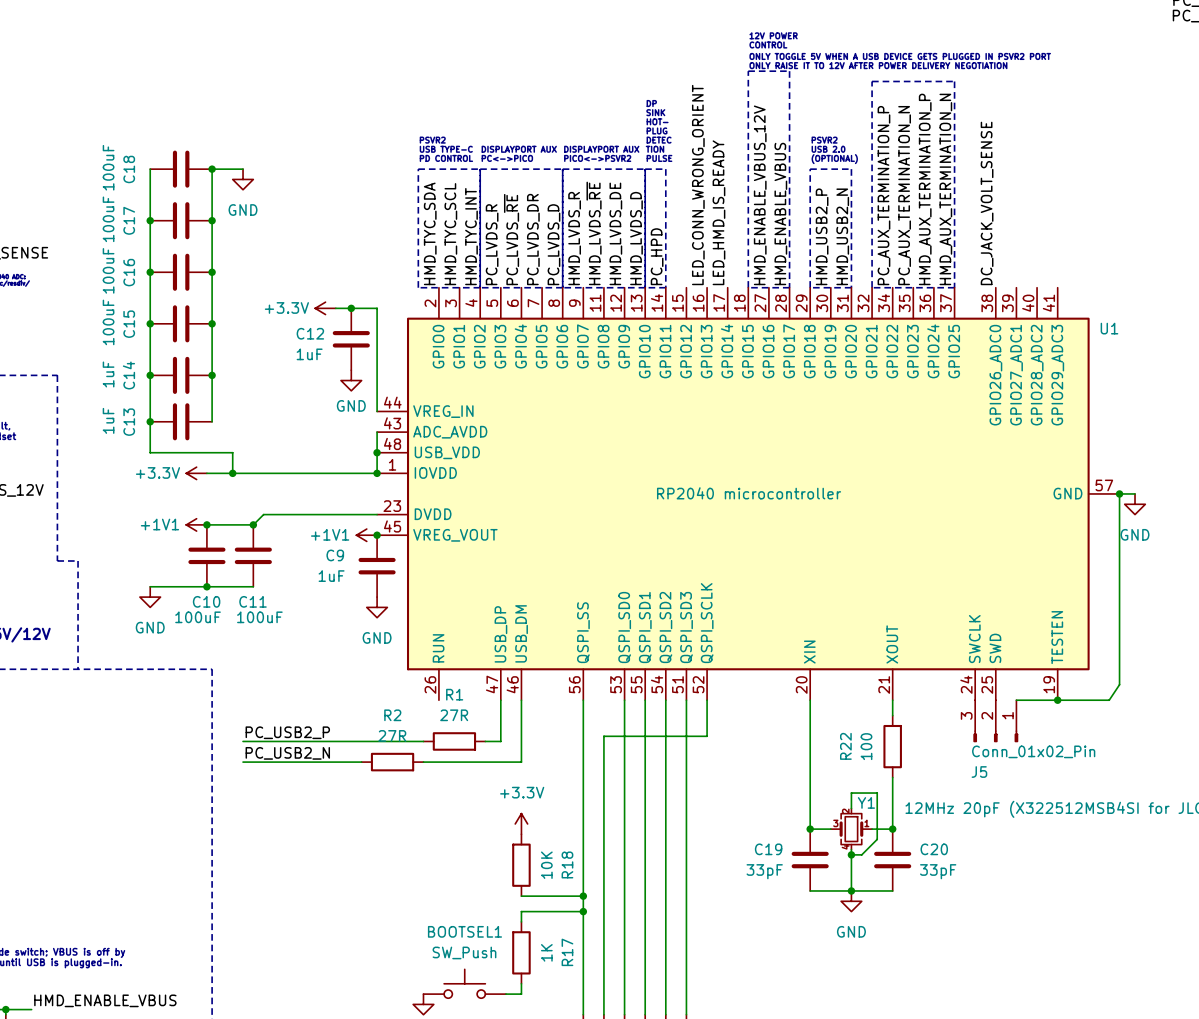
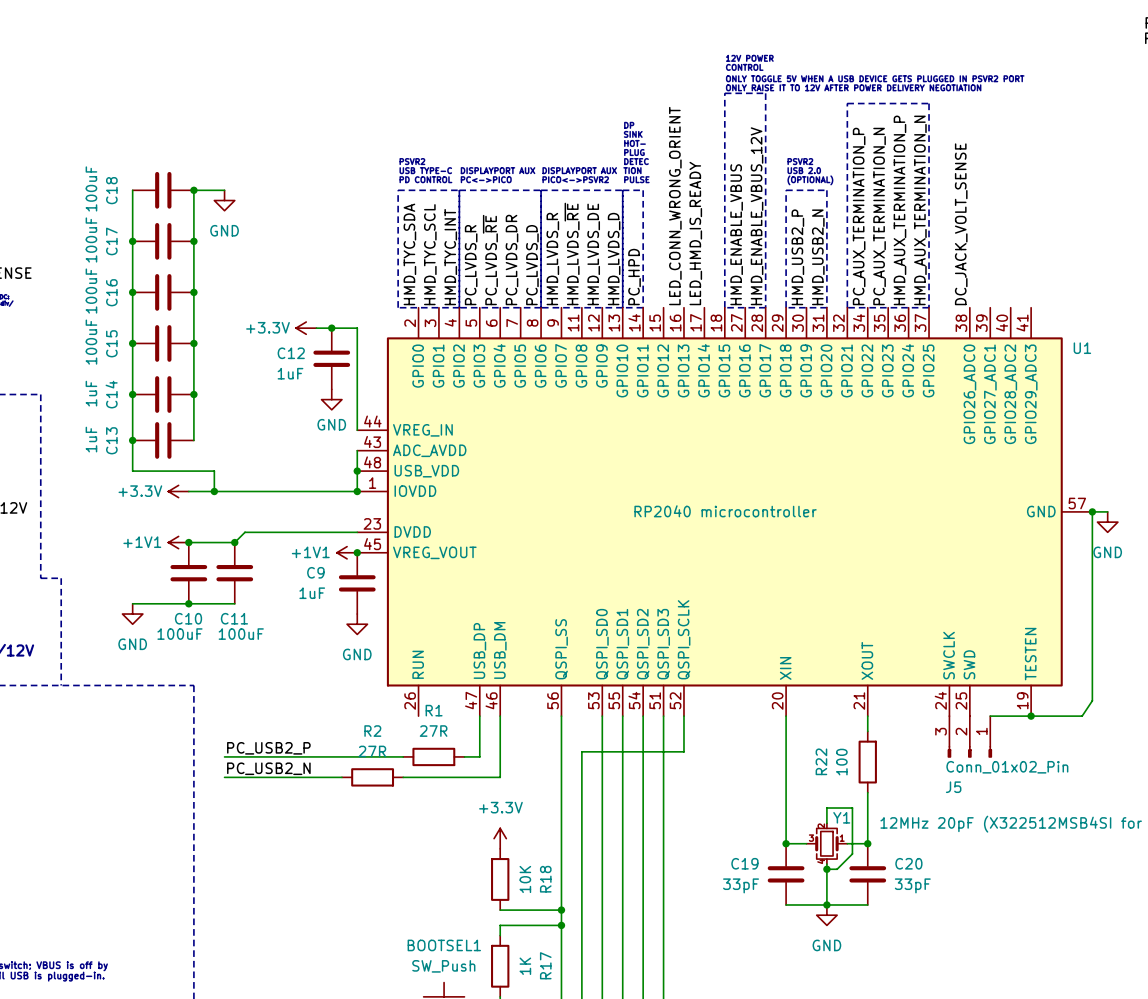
label: HMD_ENABLE_VBUS_12V (760, 195) -> HMD_ENABLE_VBUS (736, 234)
label: HMD_ENABLE_VBUS (780, 214) -> HMD_ENABLE_VBUS_12V (757, 216)

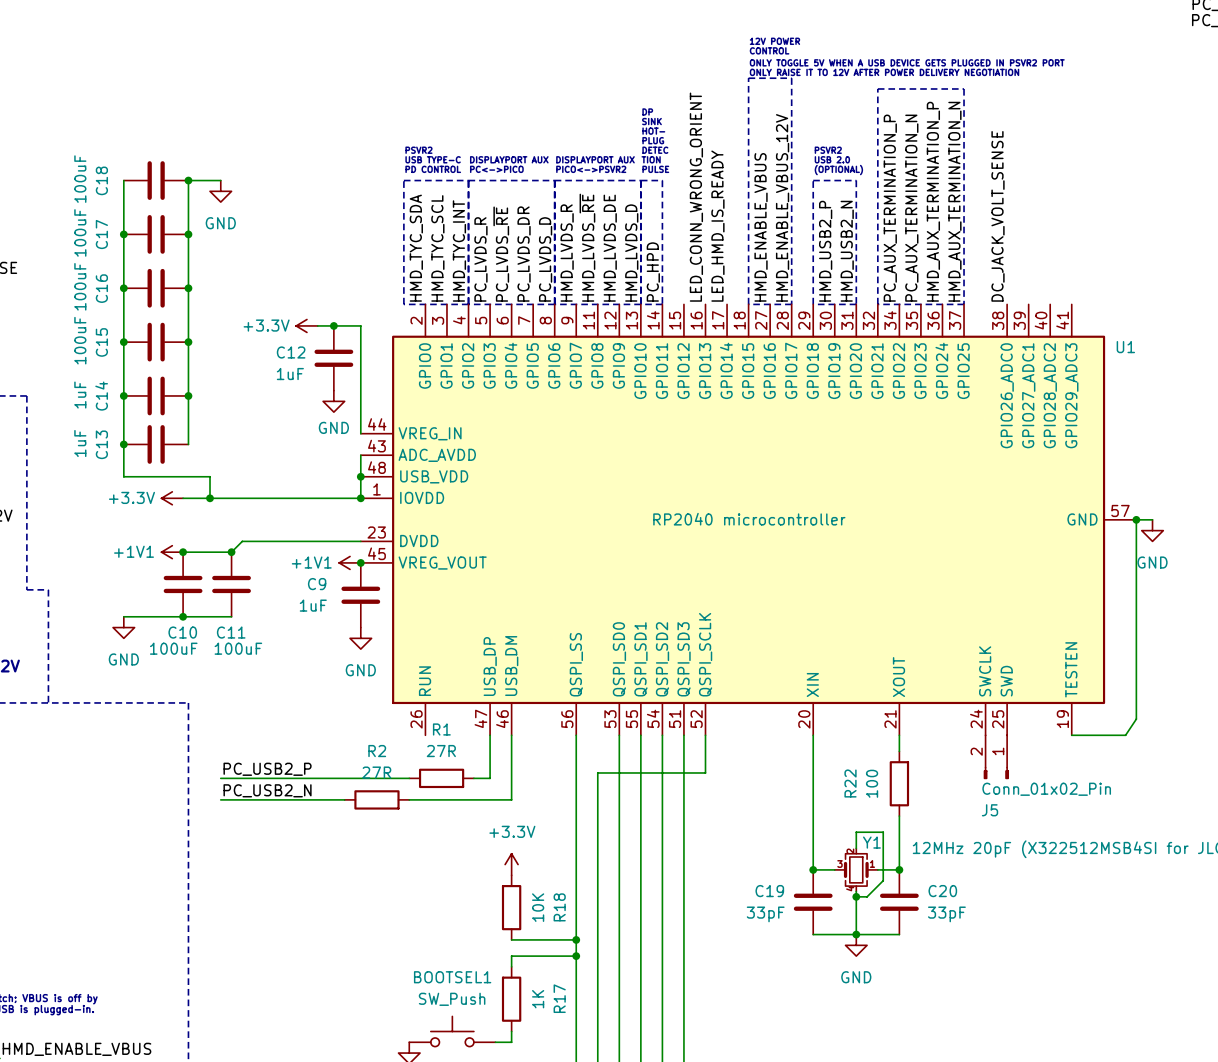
J5 symbol: [947, 716, 992, 758] -> [983, 735, 1009, 780]
wire: (990, 716) (1031, 716) -> none
junction: (1031, 716) -> none

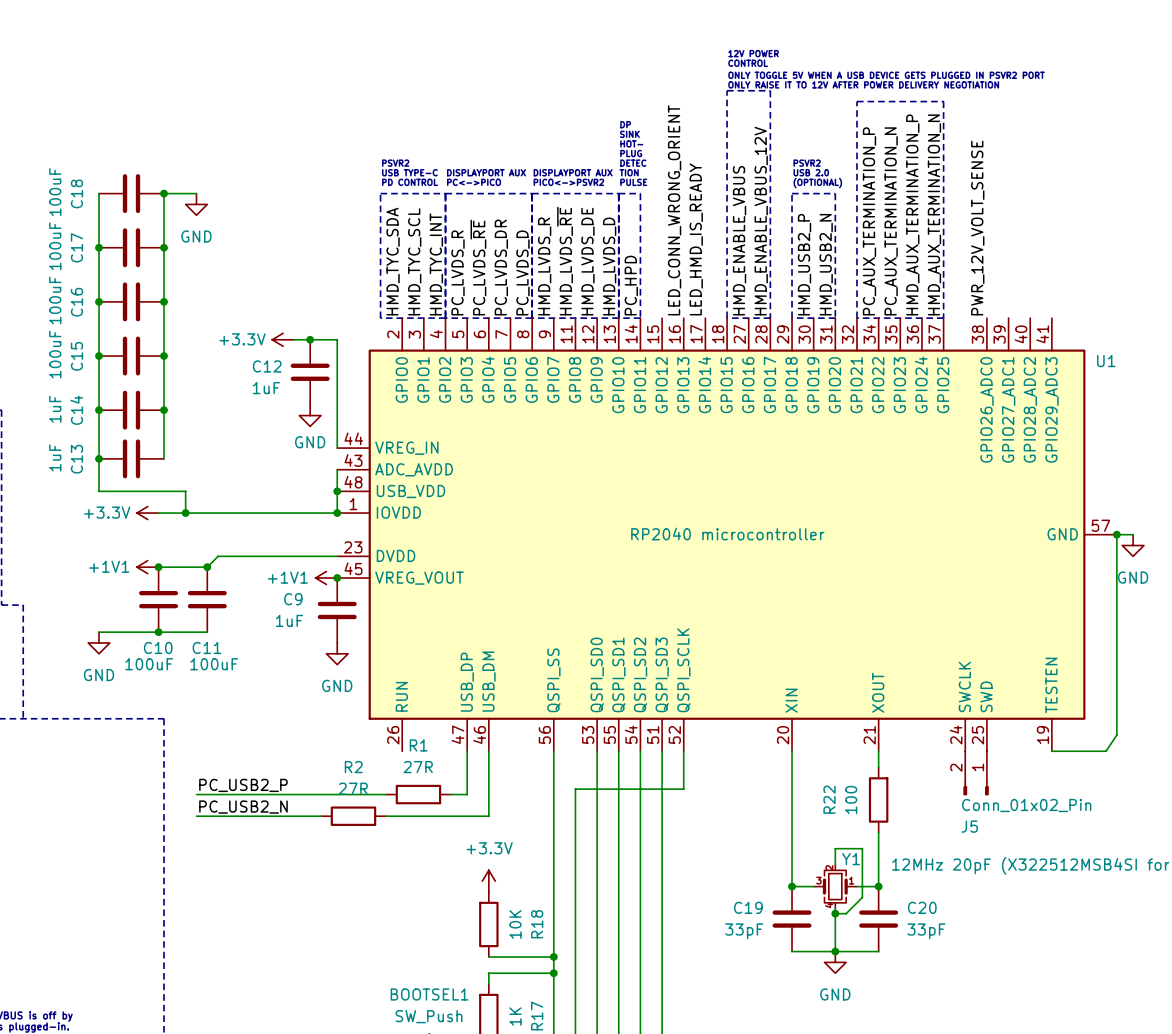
label: DC_JACK_VOLT_SENSE (998, 216) -> PWR_12V_VOLT_SENSE (977, 228)

